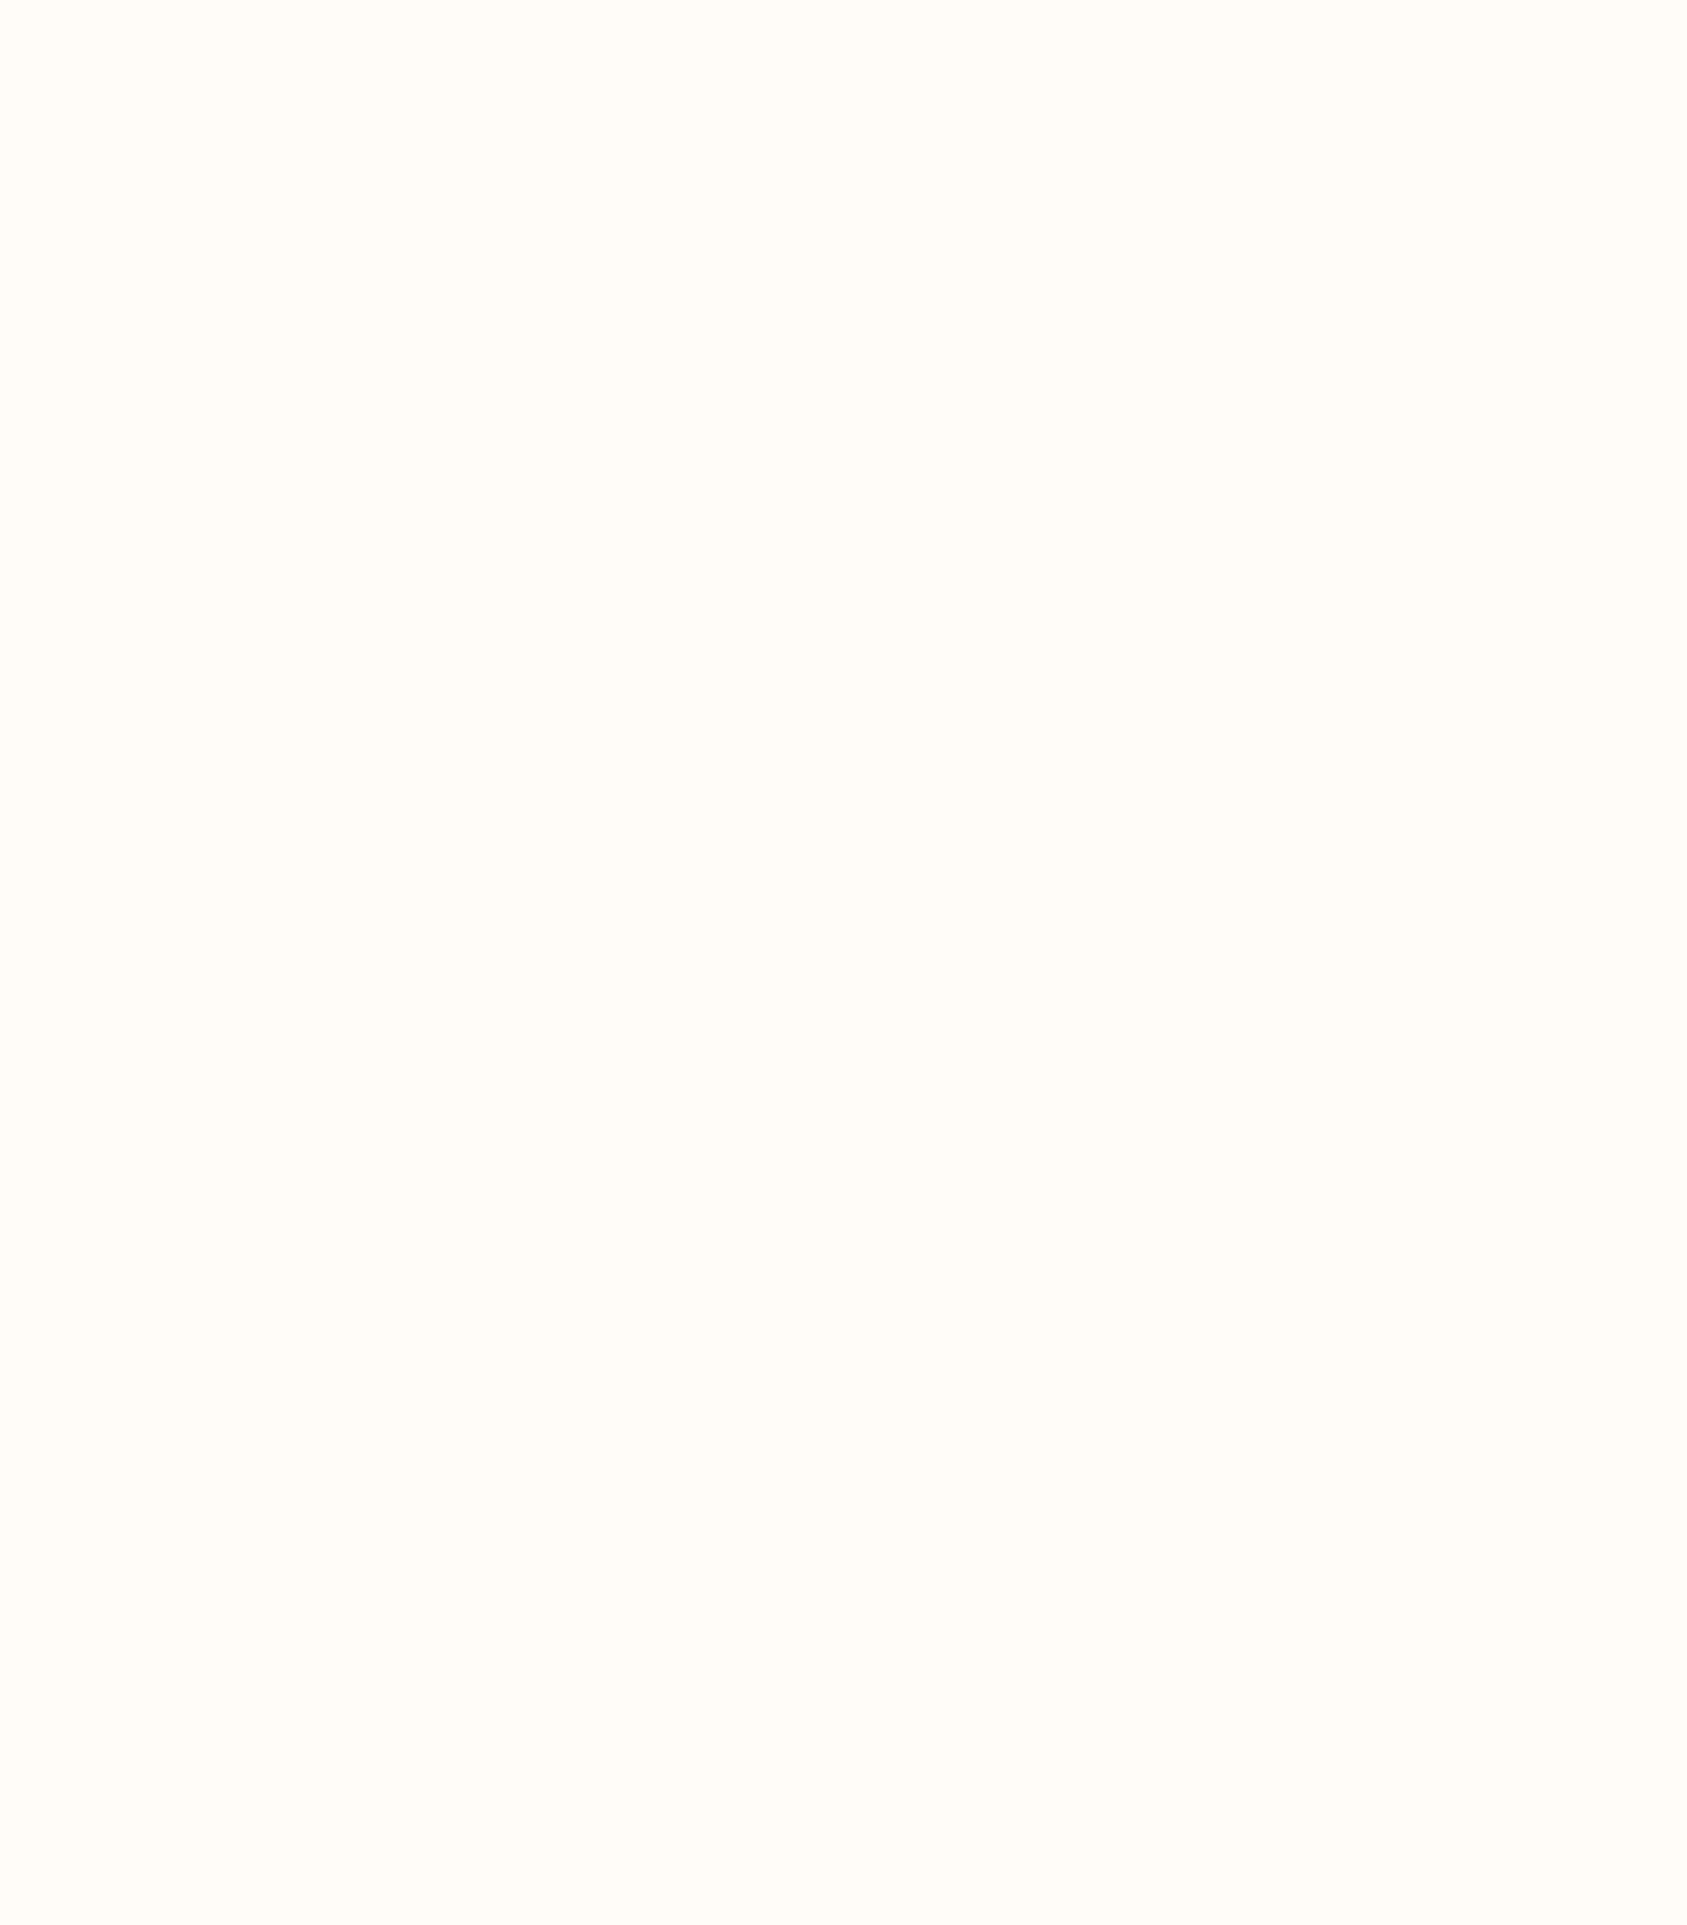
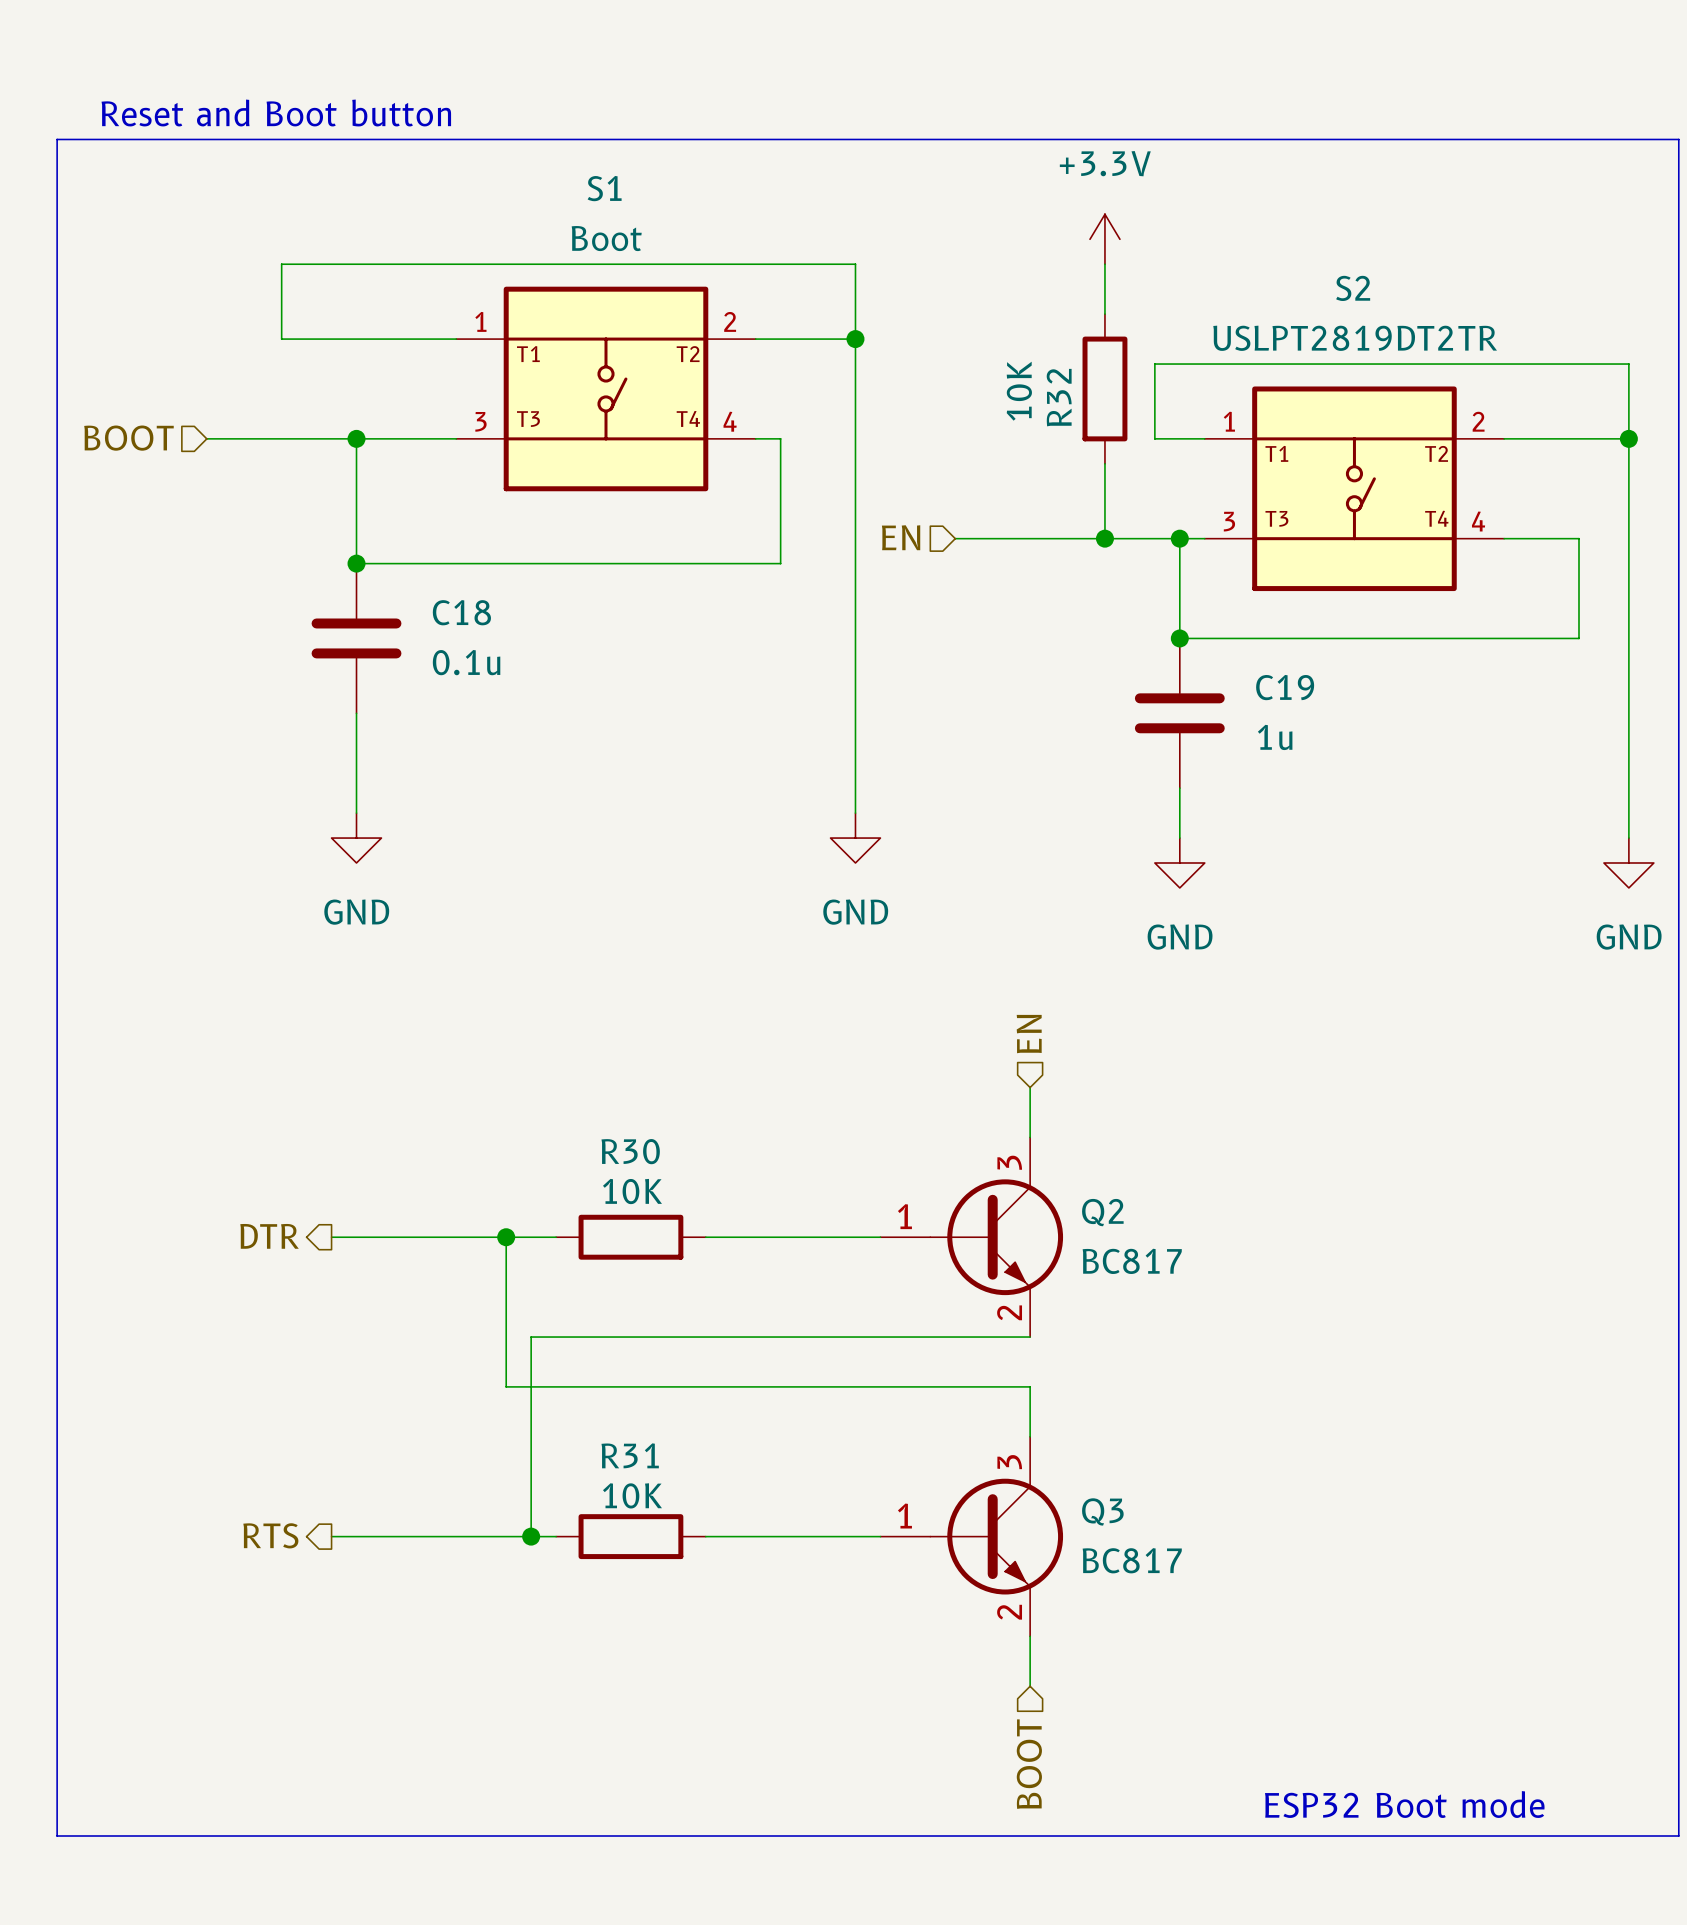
text: none -> Reset and Boot button (276, 113)
line: none -> (57, 139) (1678, 139) (1678, 1835) (57, 1835) (57, 139)
power symbol: none -> +3.3V (1104, 239)
wire: none -> (1104, 264) (1104, 314)
wire: none -> (456, 339) (281, 339) (281, 264) (855, 264) (855, 813)
wire: none -> (755, 339) (855, 339)
junction: none -> (855, 339)
S1: none -> Boot (605, 388)
R32: none -> 10K (1104, 388)
hierarchical label: none -> BOOT (128, 438)
wire: none -> (206, 438) (456, 438)
wire: none -> (356, 438) (356, 563) (780, 563) (780, 438) (755, 438)
junction: none -> (356, 438)
wire: none -> (1204, 438) (1154, 438) (1154, 364) (1628, 364) (1628, 838)
wire: none -> (1504, 438) (1628, 438)
junction: none -> (1628, 438)
wire: none -> (1104, 463) (1104, 538)
S2: none -> USLPT2819DT2TR (1354, 488)
hierarchical label: none -> EN (901, 537)
wire: none -> (955, 538) (1204, 538)
junction: none -> (1104, 538)
wire: none -> (1179, 538) (1179, 638) (1578, 638) (1578, 538) (1504, 538)
junction: none -> (1179, 538)
junction: none -> (356, 563)
C18: none -> 0.1u (356, 638)
junction: none -> (1179, 638)
wire: none -> (356, 713) (356, 813)
C19: none -> 1u (1179, 713)
wire: none -> (1179, 788) (1179, 838)
power symbol: none -> GND (356, 838)
power symbol: none -> GND (855, 838)
power symbol: none -> GND (1179, 862)
power symbol: none -> GND (1628, 862)
hierarchical label: none -> EN (1029, 1034)
wire: none -> (1030, 1087) (1030, 1137)
hierarchical label: none -> DTR (269, 1236)
wire: none -> (331, 1237) (556, 1237)
wire: none -> (506, 1237) (506, 1386) (1030, 1386) (1030, 1436)
junction: none -> (506, 1237)
R30: none -> 10K (630, 1237)
wire: none -> (705, 1237) (880, 1237)
Q2: none -> BC817 (971, 1237)
wire: none -> (1030, 1337) (531, 1337) (531, 1536)
hierarchical label: none -> RTS (270, 1535)
wire: none -> (331, 1536) (556, 1536)
junction: none -> (531, 1536)
R31: none -> 10K (630, 1536)
wire: none -> (705, 1536) (880, 1536)
Q3: none -> BC817 (971, 1536)
wire: none -> (1030, 1636) (1030, 1686)
hierarchical label: none -> BOOT (1029, 1764)
text: none -> ESP32 Boot mode (1404, 1804)

